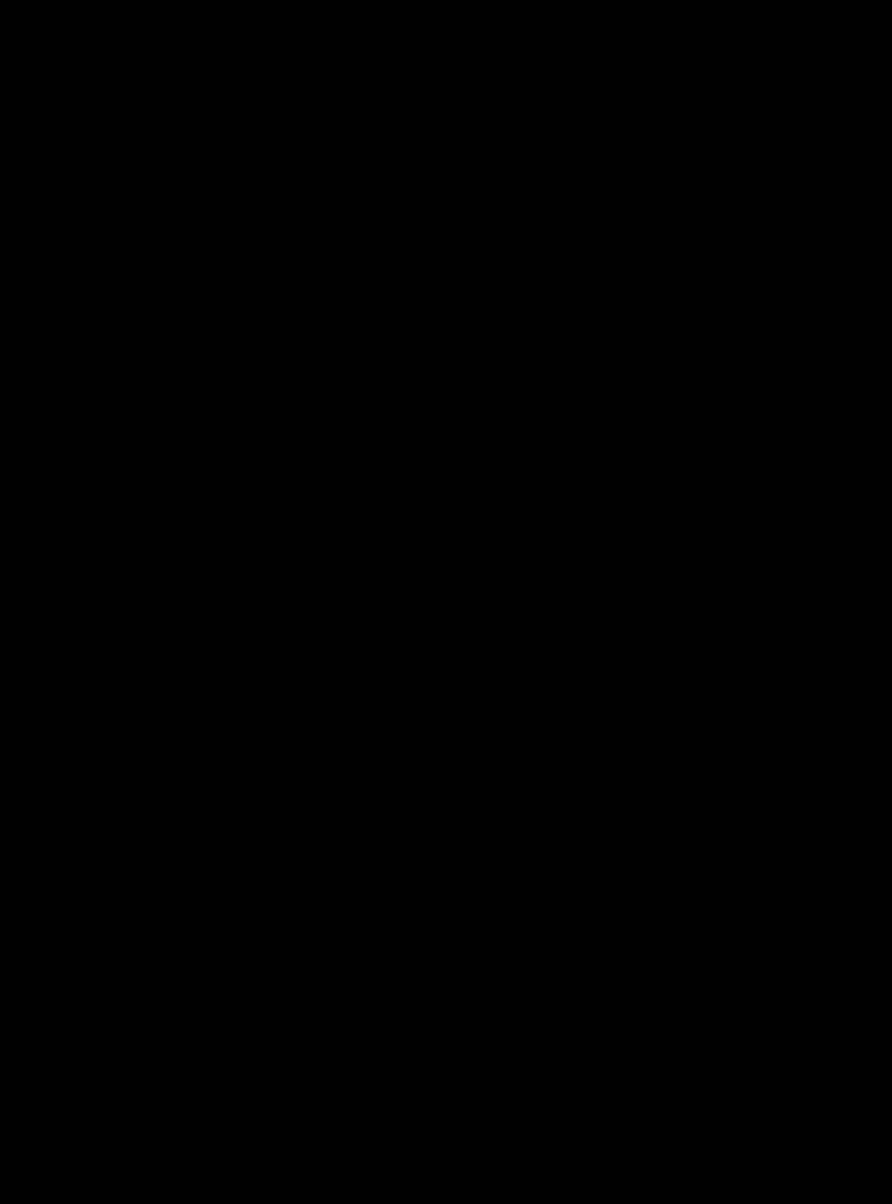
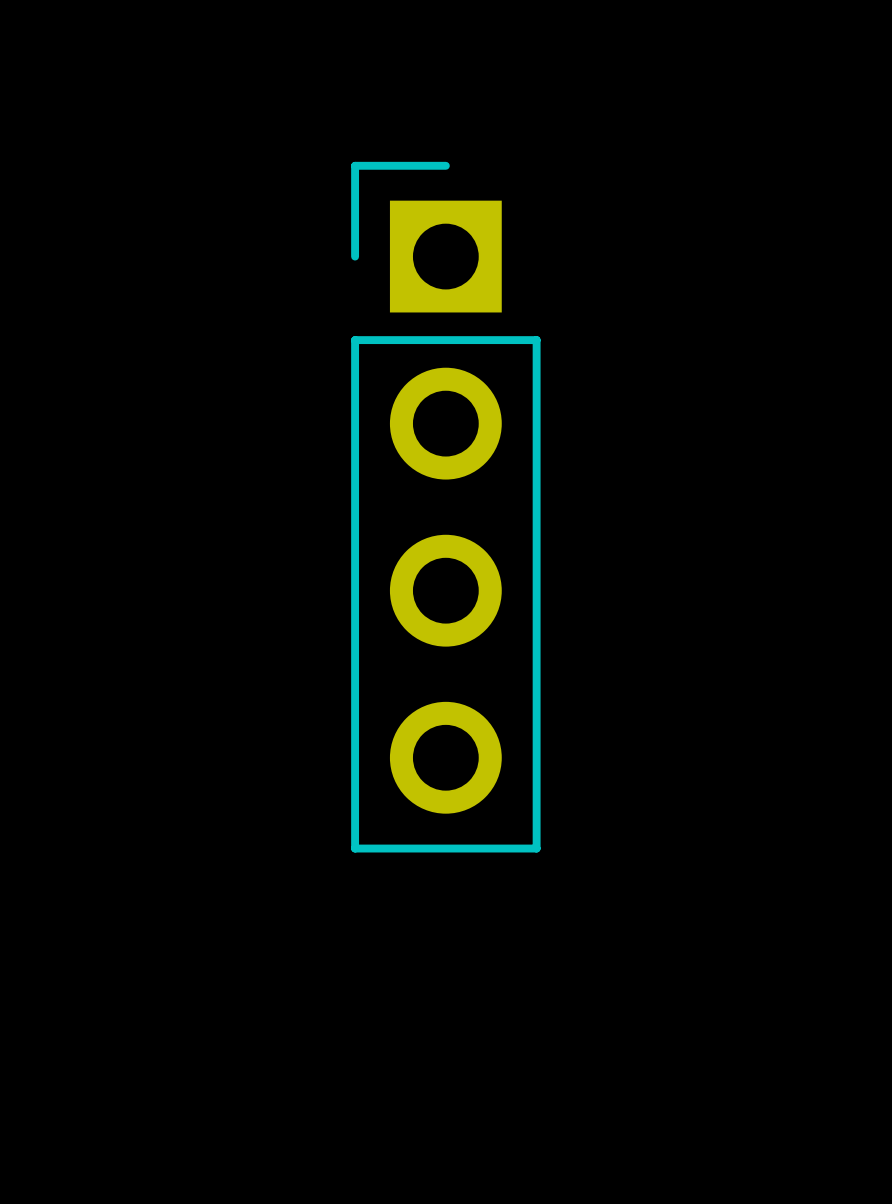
part: none -> (445, 507)

